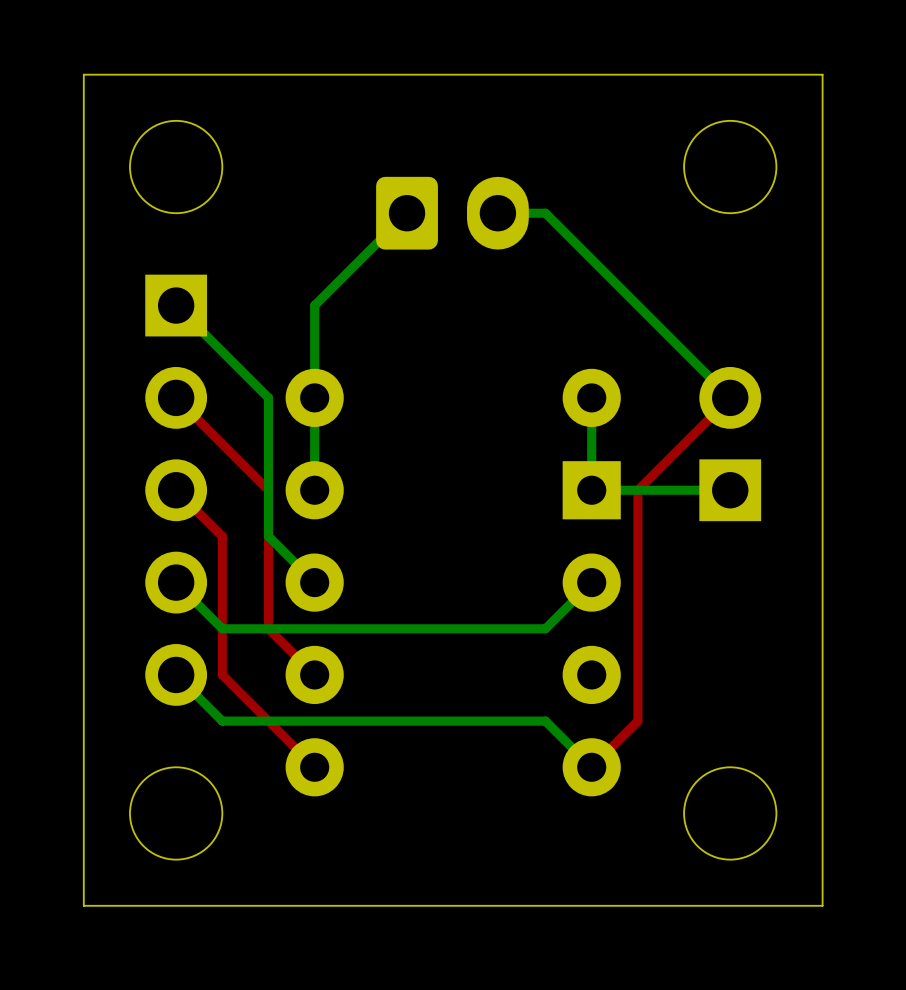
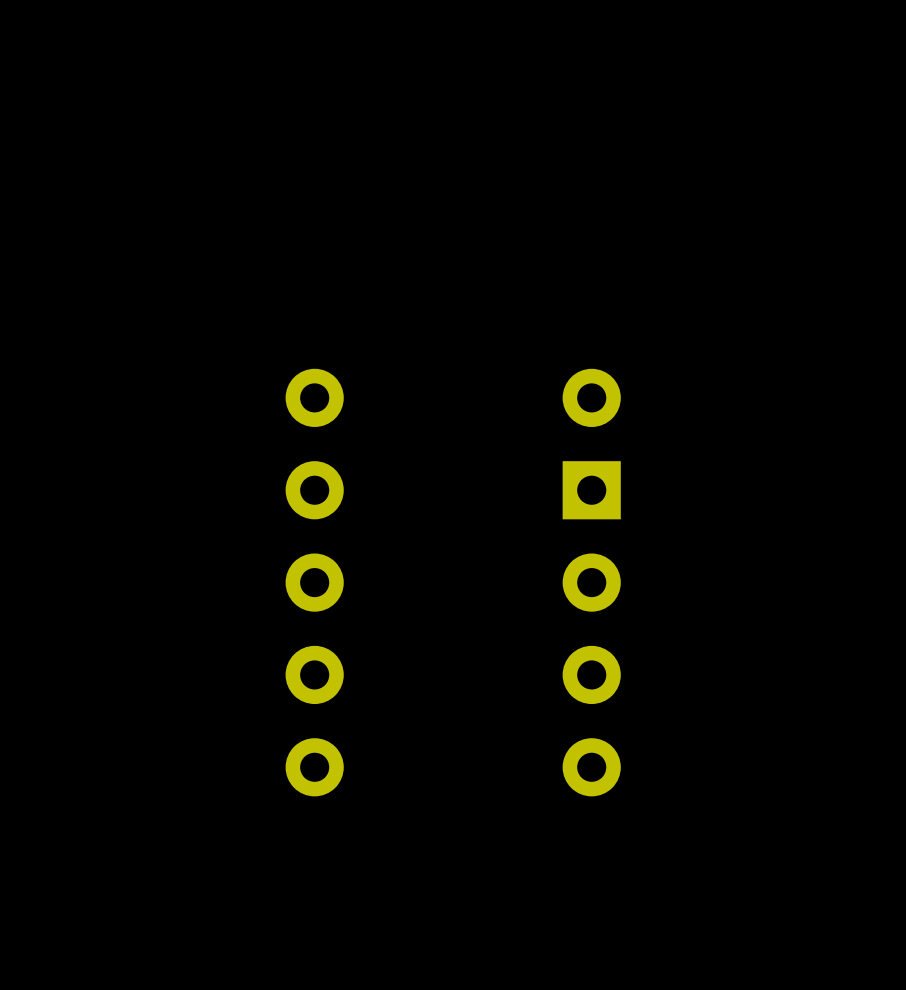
board edge: (822, 74) (822, 905) (83, 905) (83, 74) (822, 74) -> none
round board edge: [129, 119, 224, 215] -> none
round board edge: [683, 119, 778, 215] -> none
bottom track: (407, 213) (314, 305) (314, 490) -> none
part: (452, 213) -> none
bottom track: (497, 213) (545, 213) (730, 397) -> none
bottom track: (176, 305) (268, 397) (268, 536) (314, 582) -> none
top track: (176, 397) (268, 490) (268, 628) (314, 674) -> none
bottom track: (591, 397) (591, 490) (730, 490) -> none
top track: (730, 397) (637, 490) (637, 721) (591, 767) -> none
part: (730, 444) -> none
top track: (176, 490) (222, 536) (222, 674) (314, 767) -> none
part: (176, 490) -> none
bottom track: (591, 582) (545, 628) (222, 628) (176, 582) -> none
bottom track: (176, 674) (222, 721) (545, 721) (591, 767) -> none
round board edge: [129, 766, 224, 861] -> none
round board edge: [683, 766, 778, 861] -> none

